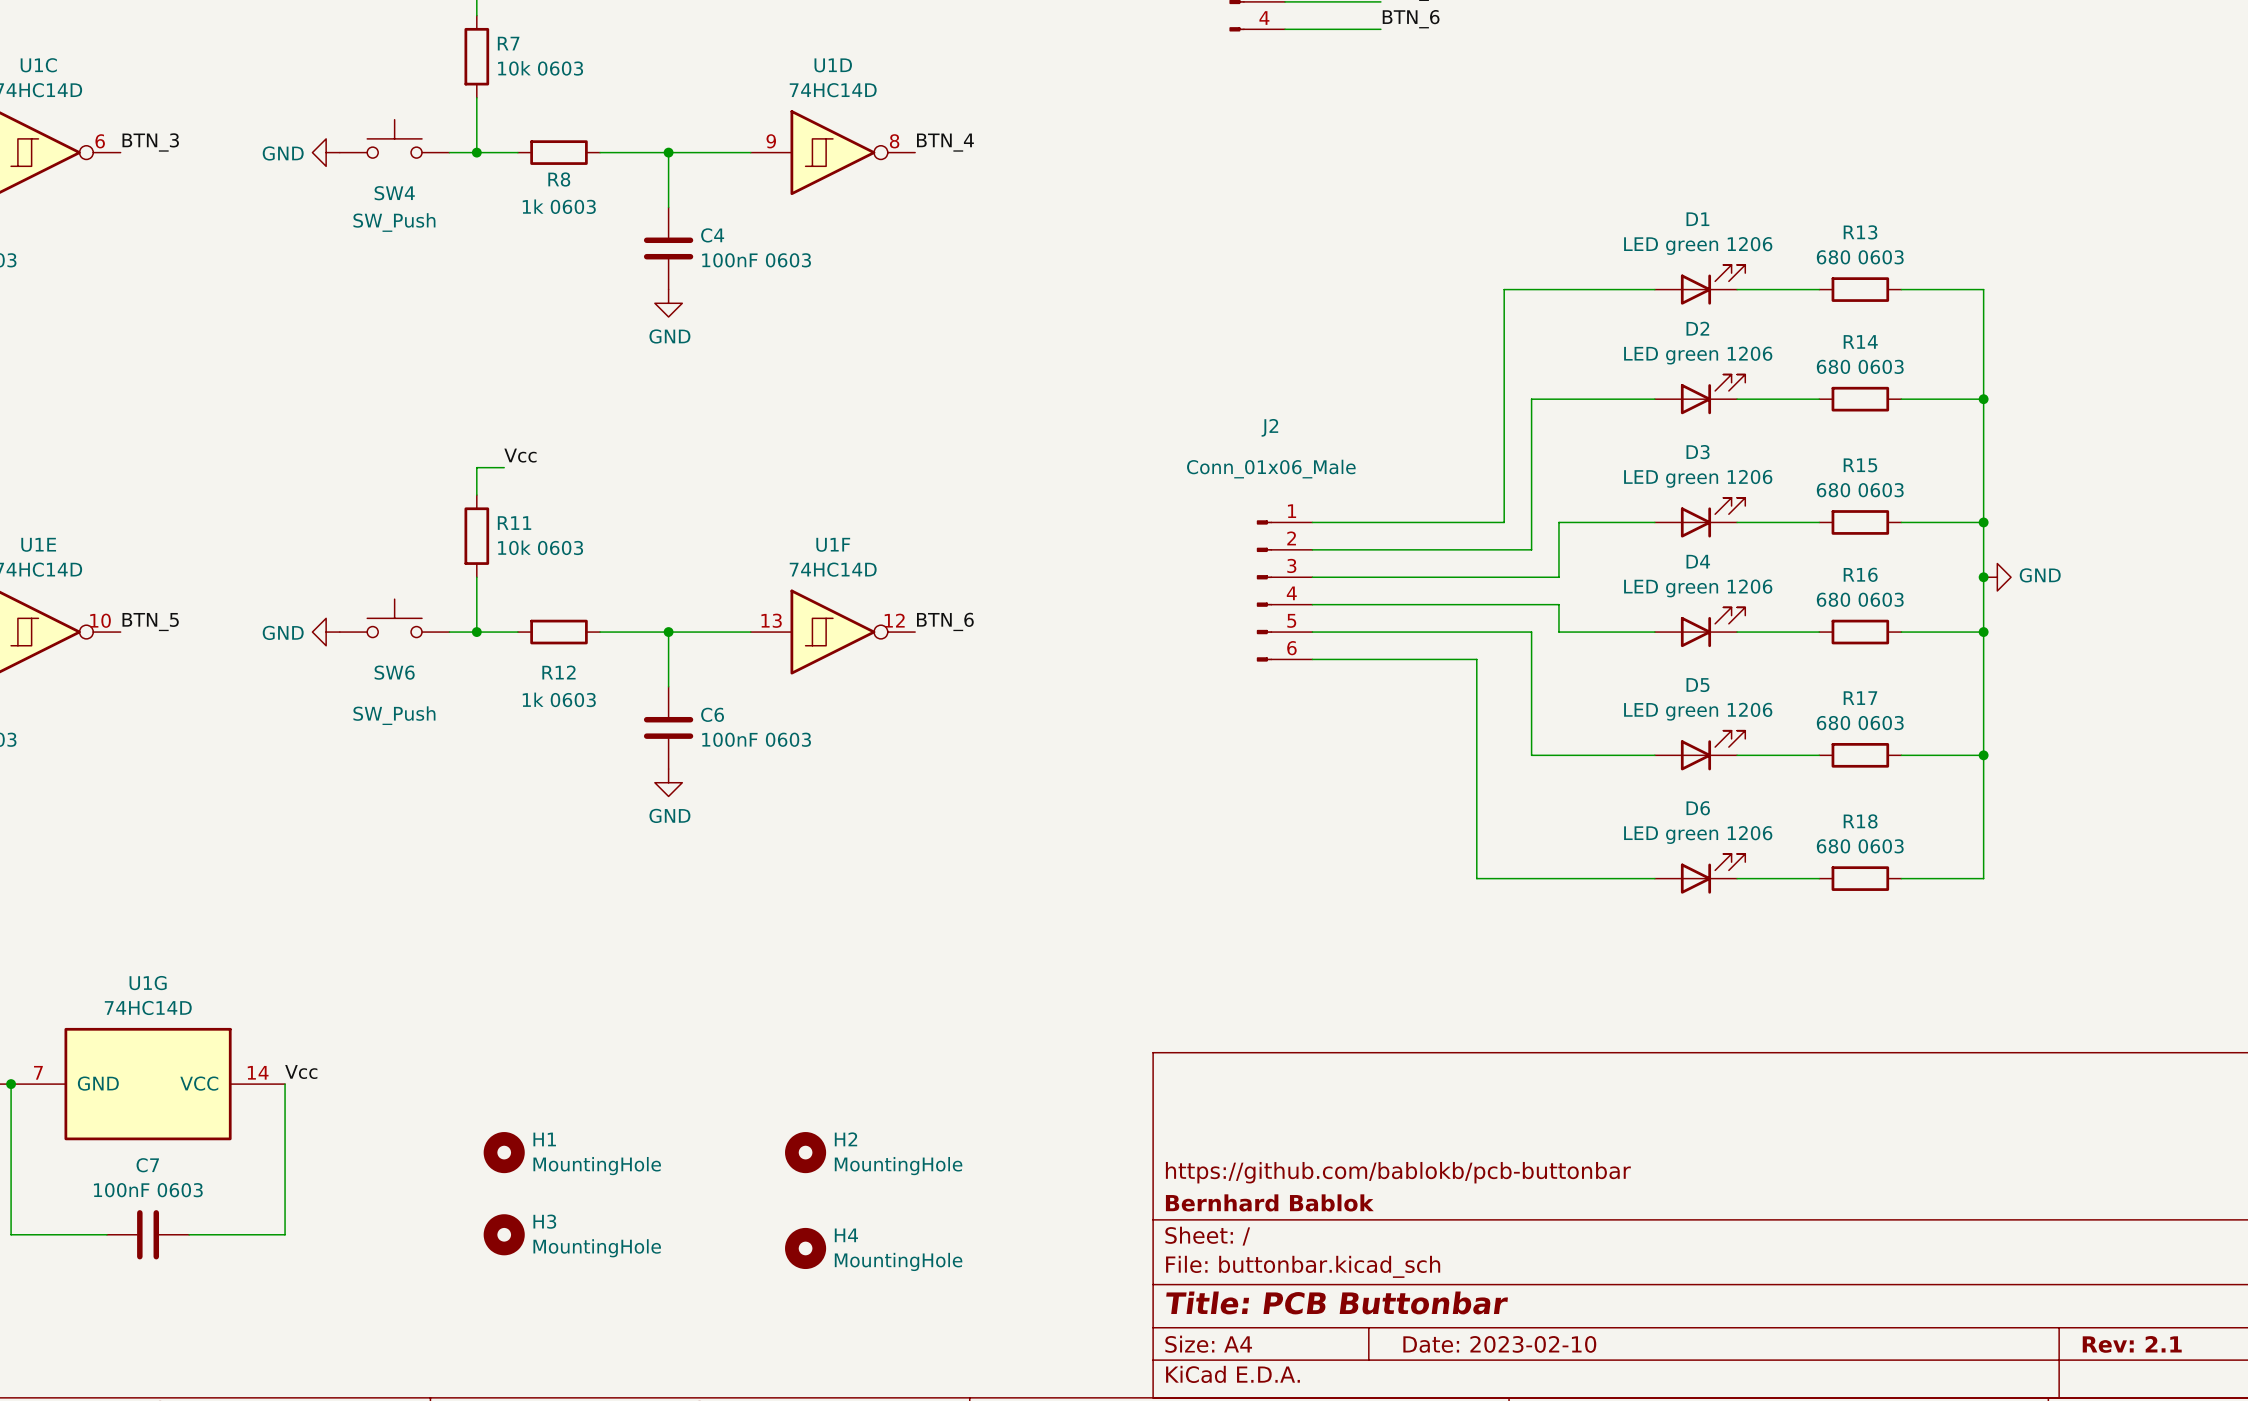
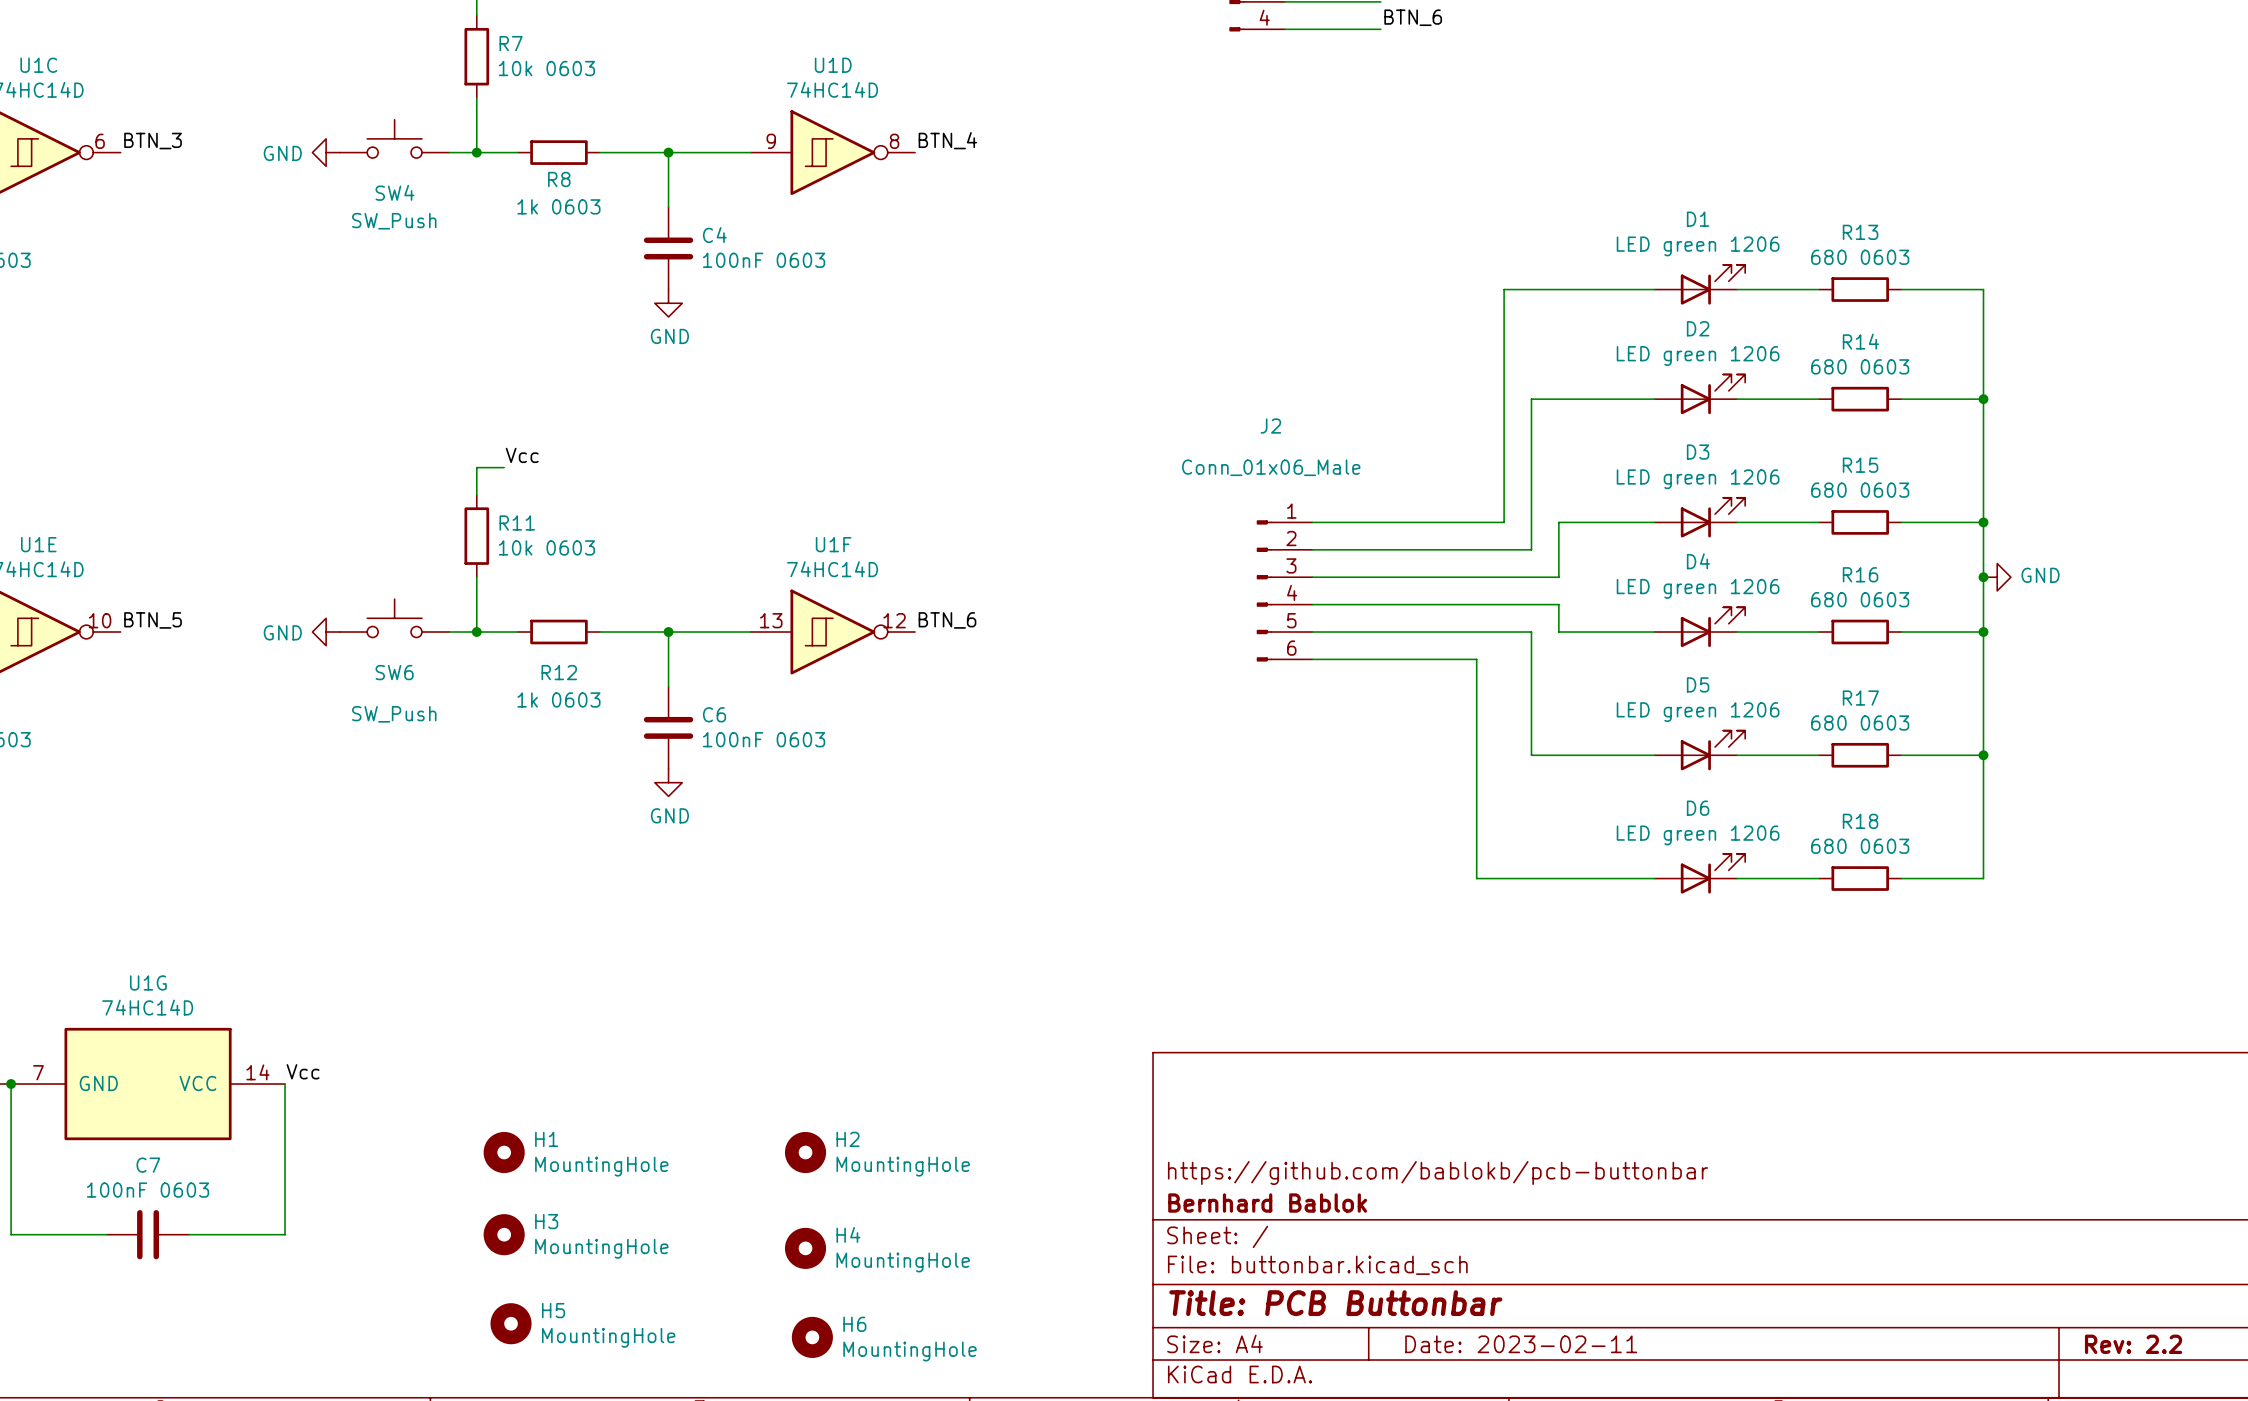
H5: none -> MountingHole (511, 1323)
H6: none -> MountingHole (812, 1337)
title block: Date: 2023-02-10 (1499, 1344) -> Date: 2023-02-11 (1521, 1344)
title block: Rev: 2.1 (2132, 1344) -> Rev: 2.2 (2133, 1344)

